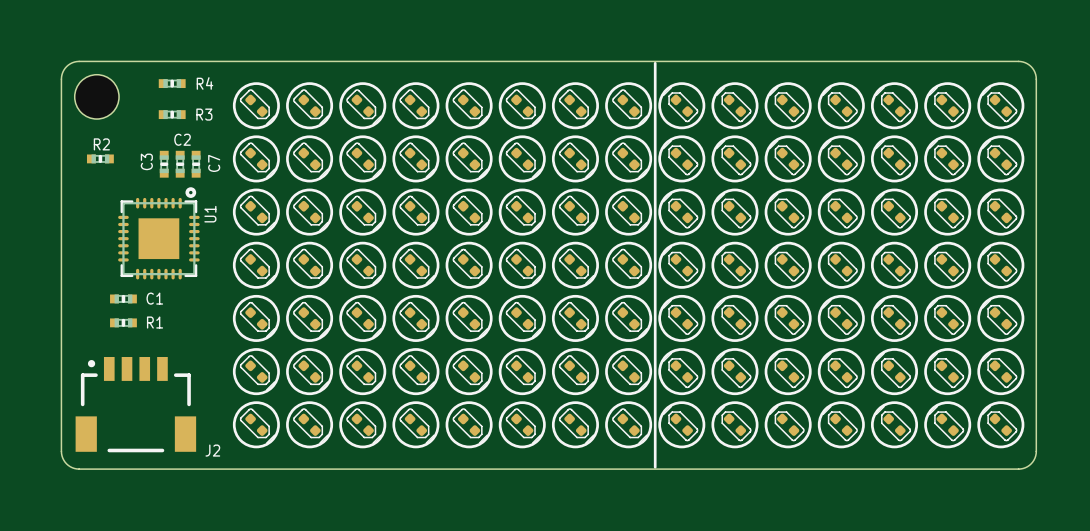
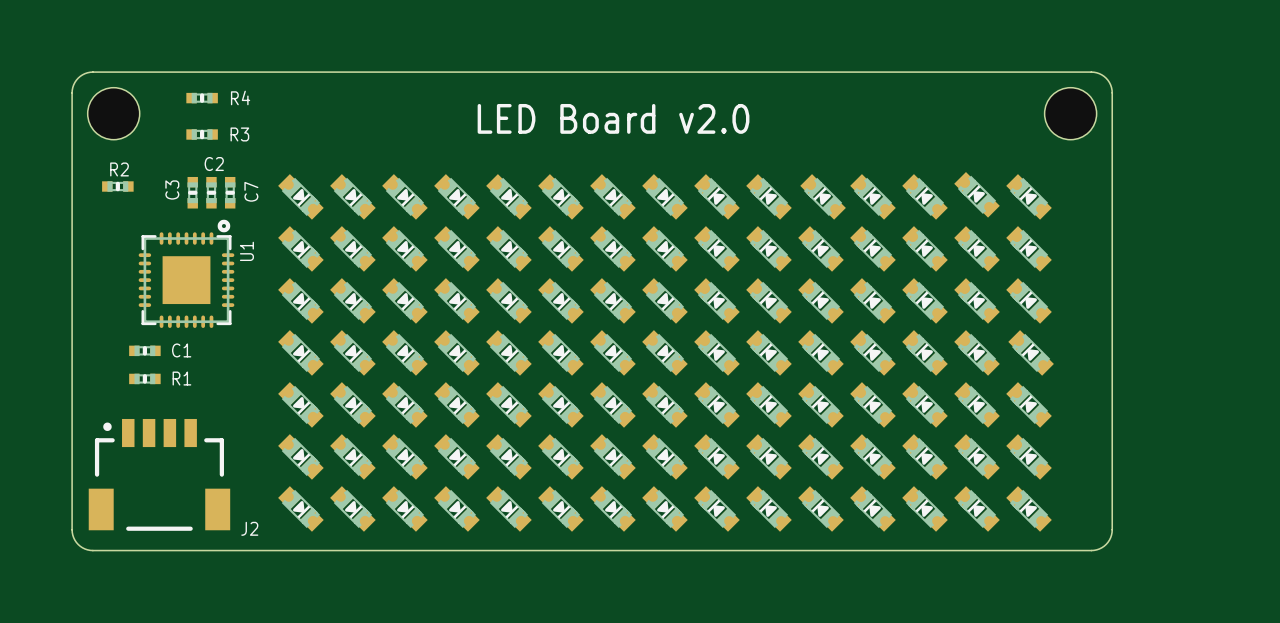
board edge: (929, 61) (1020, 61) (1032, 68) (1036, 79) (1035, 455) (1029, 465) (1020, 468) (929, 469) -> (1091, 72) (1099, 73) (1106, 78) (1110, 84) (1112, 92) (1112, 529) (1110, 537) (1106, 544) (1099, 548) (1091, 550)
line: (655, 63) (655, 467) -> none
drawing: [232, 82, 1025, 449] -> none
hole: none -> (1070, 113)
text: none -> LED Board v2.0 (613, 118)
part: (680, 104) -> none
part: (733, 104) -> none
part: (786, 104) -> none
part: (840, 104) -> none
part: (893, 104) -> none
part: (946, 104) -> none
part: (999, 104) -> none
part: (257, 107) -> none
part: (310, 107) -> none
part: (364, 107) -> none
part: (417, 107) -> none
part: (470, 107) -> none
part: (523, 107) -> none
part: (576, 107) -> none
part: (629, 107) -> none
part footprint: [716, 139, 752, 176] -> [850, 174, 896, 220]
part footprint: [769, 139, 805, 176] -> [902, 174, 948, 220]
part footprint: [822, 139, 858, 176] -> [954, 172, 1000, 218]
part footprint: [239, 142, 276, 178] -> [278, 174, 324, 220]
part footprint: [293, 142, 329, 178] -> [330, 174, 376, 220]
part footprint: [452, 142, 489, 178] -> [538, 174, 584, 220]
part footprint: [505, 142, 542, 178] -> [590, 174, 636, 220]
part footprint: [558, 142, 595, 178] -> [642, 174, 688, 220]
part: (680, 157) -> none
part: (893, 157) -> none
part: (946, 157) -> none
part: (999, 157) -> none
part: (364, 160) -> none
part: (417, 160) -> none
part: (629, 160) -> none
part: none -> (404, 196)
part: none -> (456, 196)
part: none -> (508, 196)
part: none -> (716, 196)
part: none -> (768, 196)
part: none -> (823, 196)
part: none -> (1029, 196)
part footprint: [716, 193, 752, 229] -> [850, 226, 896, 272]
part footprint: [769, 193, 805, 229] -> [902, 226, 948, 272]
part footprint: [822, 193, 858, 229] -> [954, 226, 1000, 272]
part footprint: [875, 193, 911, 229] -> [1006, 226, 1052, 272]
part footprint: [239, 195, 276, 232] -> [278, 226, 324, 272]
part footprint: [293, 195, 329, 232] -> [330, 226, 376, 272]
part footprint: [452, 195, 489, 232] -> [538, 226, 584, 272]
part footprint: [505, 195, 542, 232] -> [590, 226, 636, 272]
part footprint: [558, 195, 595, 232] -> [642, 226, 688, 272]
part: (680, 210) -> none
part: (946, 210) -> none
part: (999, 210) -> none
part: none -> (404, 248)
part: none -> (456, 248)
part: none -> (508, 248)
part: none -> (716, 248)
part: none -> (768, 248)
part: none -> (820, 248)
part: (364, 213) -> none
part: (417, 213) -> none
part: (629, 213) -> none
part footprint: [716, 246, 752, 282] -> [850, 278, 896, 324]
part footprint: [769, 246, 805, 282] -> [902, 278, 948, 324]
part footprint: [822, 246, 858, 282] -> [954, 278, 1000, 324]
part footprint: [239, 248, 276, 285] -> [278, 278, 324, 324]
part footprint: [293, 248, 329, 285] -> [330, 278, 376, 324]
part footprint: [452, 248, 489, 285] -> [538, 278, 584, 324]
part footprint: [505, 248, 542, 285] -> [590, 278, 636, 324]
part footprint: [558, 248, 595, 285] -> [642, 278, 688, 324]
part: none -> (404, 300)
part: none -> (456, 300)
part: none -> (508, 300)
part: none -> (716, 300)
part: none -> (768, 300)
part: none -> (820, 300)
part: none -> (1029, 300)
part: (680, 264) -> none
part: (893, 264) -> none
part: (946, 264) -> none
part: (999, 264) -> none
part: (364, 266) -> none
part: (417, 266) -> none
part: (629, 266) -> none
part: none -> (300, 352)
part: none -> (352, 352)
part: none -> (404, 352)
part: none -> (456, 352)
part: none -> (508, 352)
part: none -> (560, 352)
part: none -> (612, 352)
part: none -> (664, 352)
part: none -> (716, 352)
part: none -> (768, 352)
part: none -> (820, 352)
part: none -> (872, 352)
part: none -> (925, 352)
part: none -> (977, 352)
part: none -> (1031, 352)
part: (680, 317) -> none
part: (733, 317) -> none
part: (786, 317) -> none
part: (840, 317) -> none
part: (893, 317) -> none
part: (946, 317) -> none
part: (999, 317) -> none
part: (257, 319) -> none
part: (310, 319) -> none
part: (364, 319) -> none
part: (417, 319) -> none
part: (470, 319) -> none
part: (523, 319) -> none
part: (576, 319) -> none
part: (629, 319) -> none
part: none -> (300, 404)
part: none -> (352, 404)
part: none -> (404, 404)
part: none -> (456, 404)
part: none -> (508, 404)
part: none -> (560, 404)
part: none -> (612, 404)
part: none -> (664, 404)
part: none -> (716, 404)
part: none -> (768, 404)
part: none -> (820, 404)
part: none -> (872, 404)
part: none -> (925, 404)
part: none -> (977, 404)
part: none -> (1029, 404)
part: (680, 370) -> none
part: (733, 370) -> none
part: (786, 370) -> none
part: (840, 370) -> none
part: (893, 370) -> none
part: (946, 370) -> none
part: (999, 370) -> none
part: (257, 372) -> none
part: (310, 372) -> none
part: (364, 372) -> none
part: (417, 372) -> none
part: (470, 372) -> none
part: (523, 372) -> none
part: (576, 372) -> none
part: (629, 372) -> none
part: none -> (300, 456)
part: none -> (352, 456)
part: none -> (404, 456)
part: none -> (456, 456)
part: none -> (508, 456)
part: none -> (560, 456)
part: none -> (612, 456)
part: none -> (664, 456)
part: none -> (716, 456)
part: none -> (768, 456)
part: none -> (820, 456)
part: none -> (872, 456)
part: none -> (925, 456)
part: none -> (977, 456)
part: none -> (1029, 456)
part footprint: [716, 405, 752, 442] -> [850, 486, 896, 532]
part footprint: [769, 405, 805, 442] -> [902, 486, 948, 532]
part footprint: [822, 405, 858, 442] -> [954, 486, 1000, 532]
part footprint: [239, 408, 276, 444] -> [278, 486, 324, 532]
part footprint: [293, 408, 329, 444] -> [330, 486, 376, 532]
part footprint: [452, 408, 489, 444] -> [538, 486, 584, 532]
part footprint: [505, 408, 542, 444] -> [590, 486, 636, 532]
part footprint: [558, 408, 595, 444] -> [642, 486, 688, 532]
part: (680, 423) -> none
part: (893, 423) -> none
part: (946, 423) -> none
part: (999, 423) -> none
part: (364, 426) -> none
part: (417, 426) -> none
part: (629, 426) -> none
part: none -> (404, 508)
part: none -> (456, 508)
part: none -> (508, 508)
part: none -> (716, 508)
part: none -> (768, 508)
part: none -> (820, 508)
part: none -> (1029, 508)

